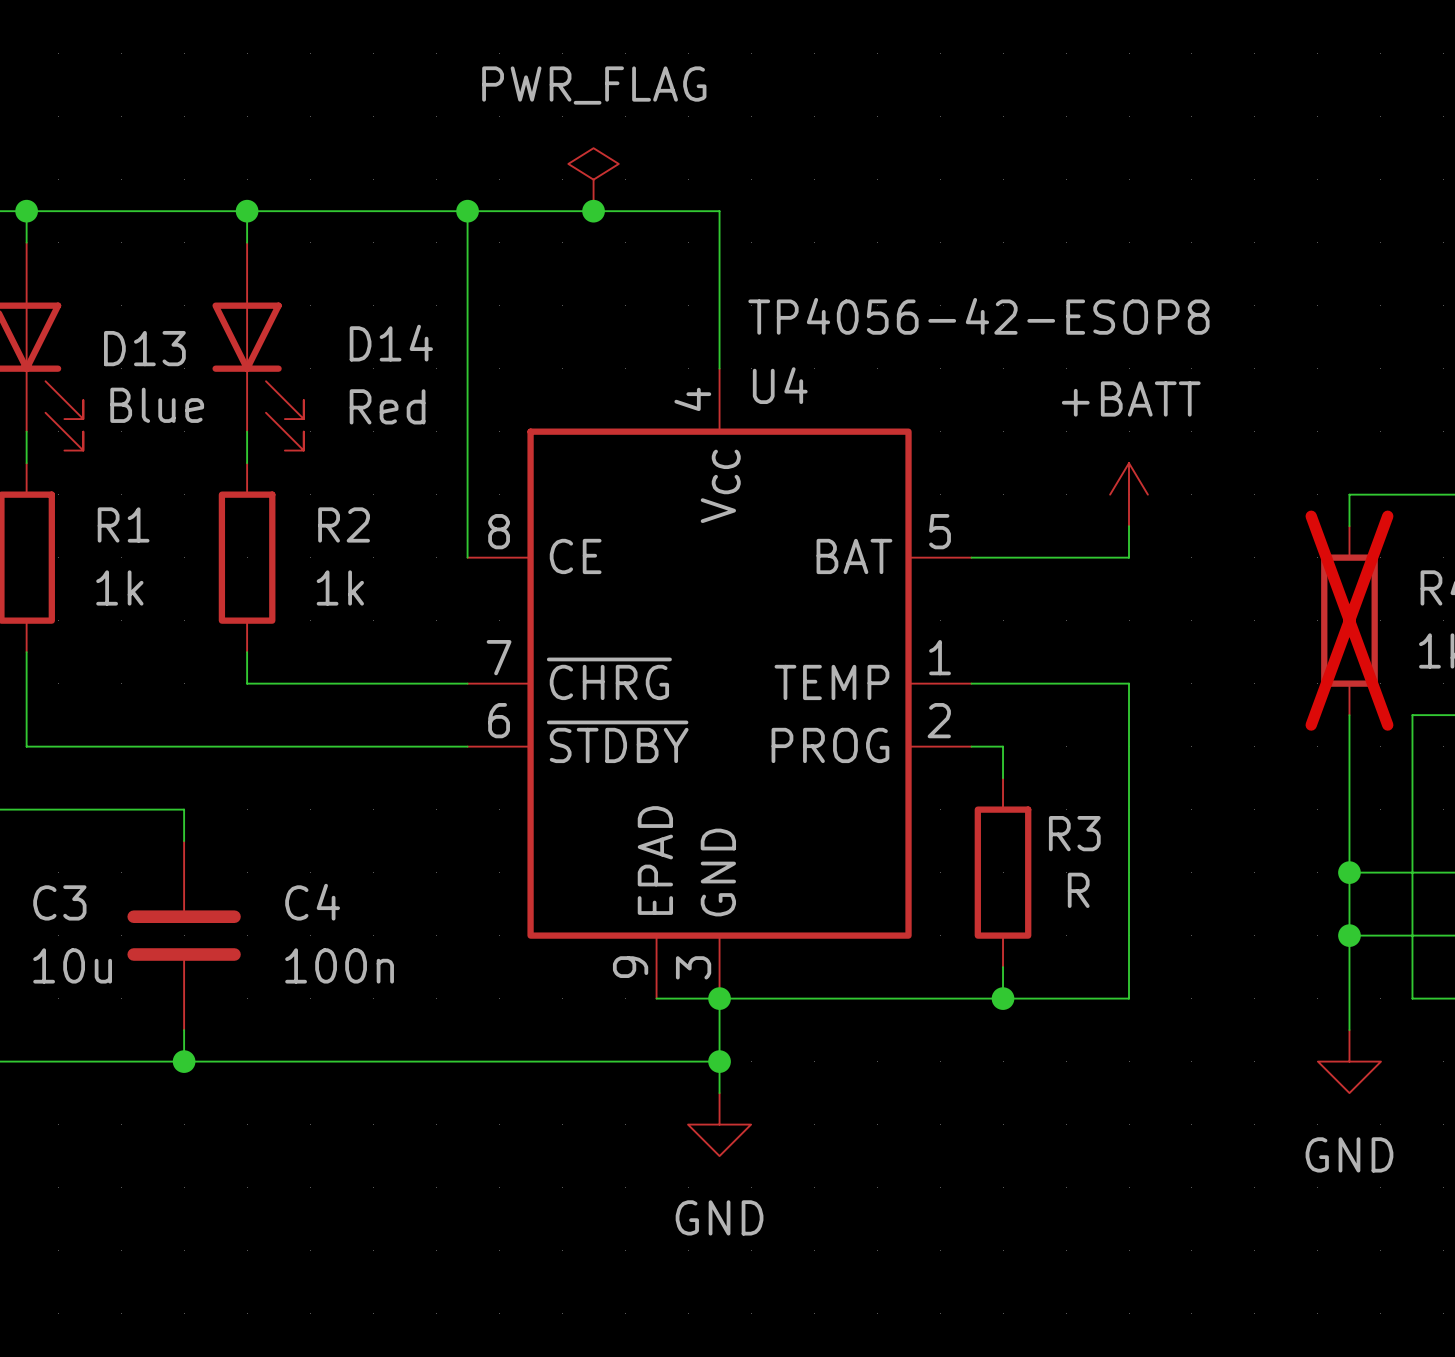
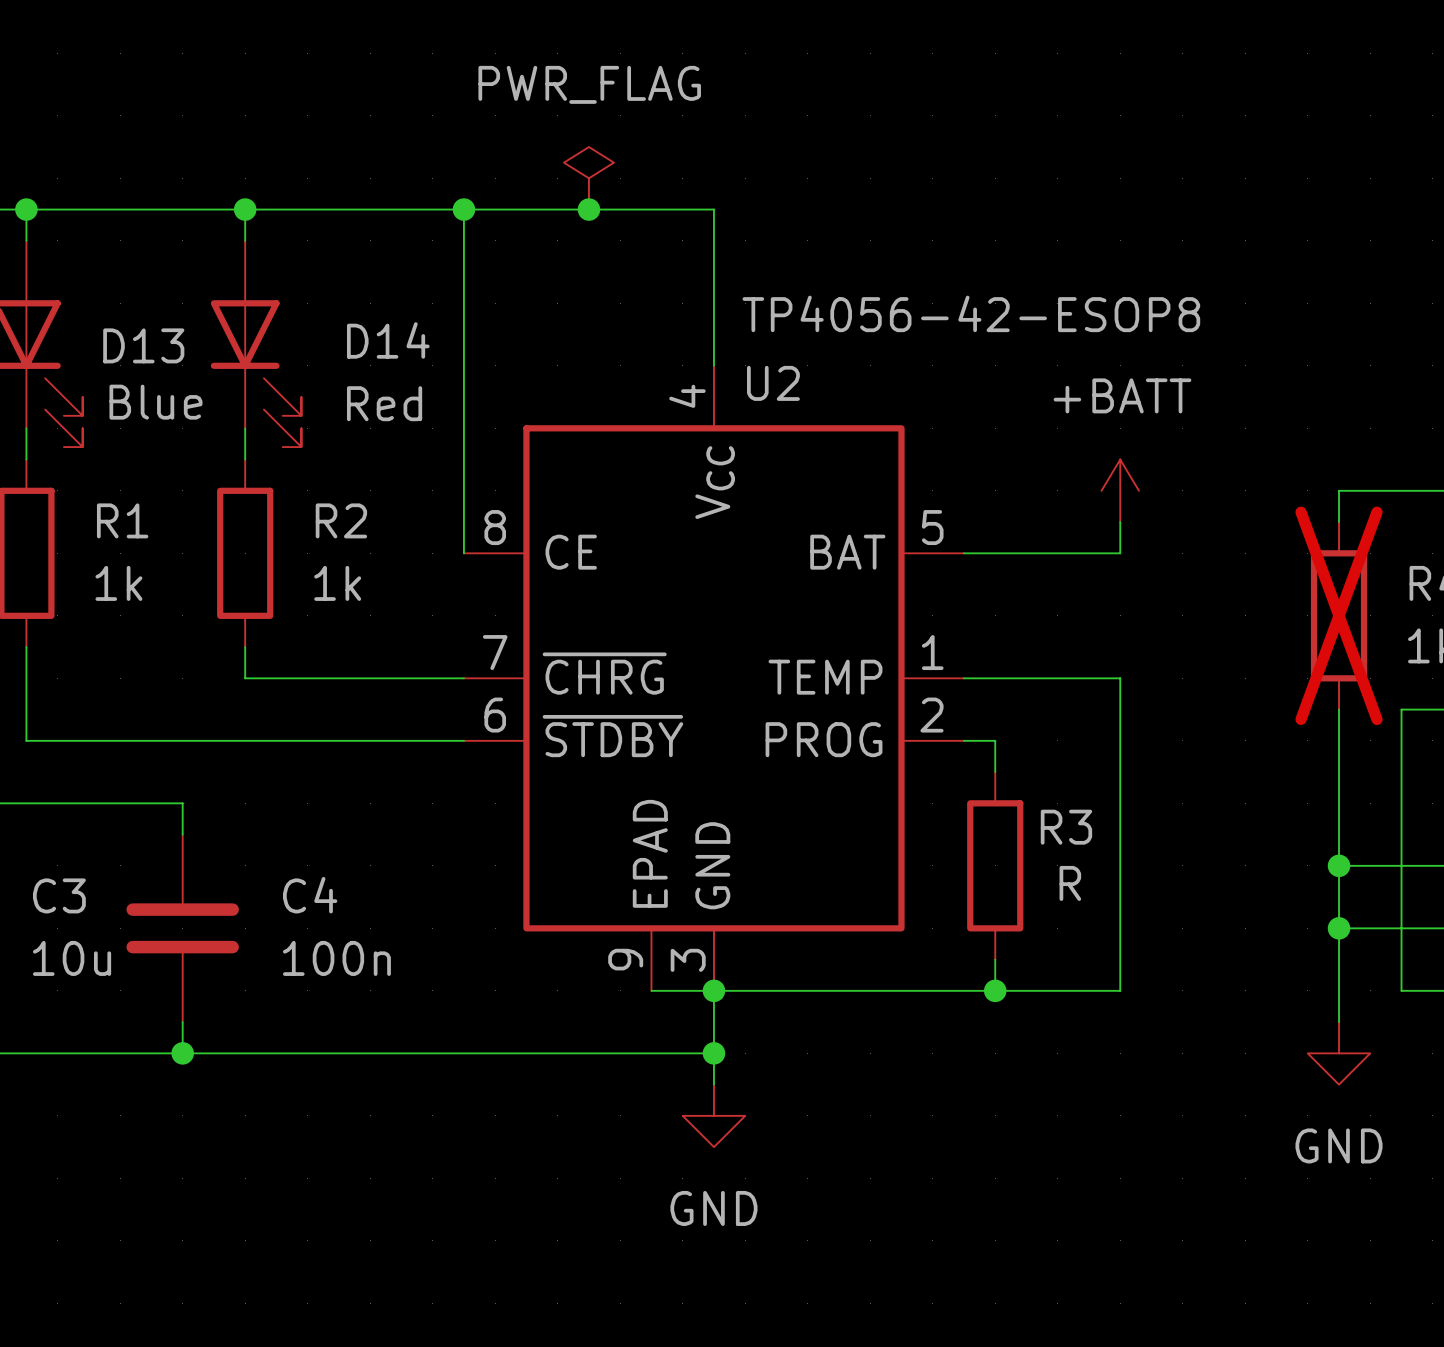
U4 name: U4 (780, 385) -> U2 (773, 383)

